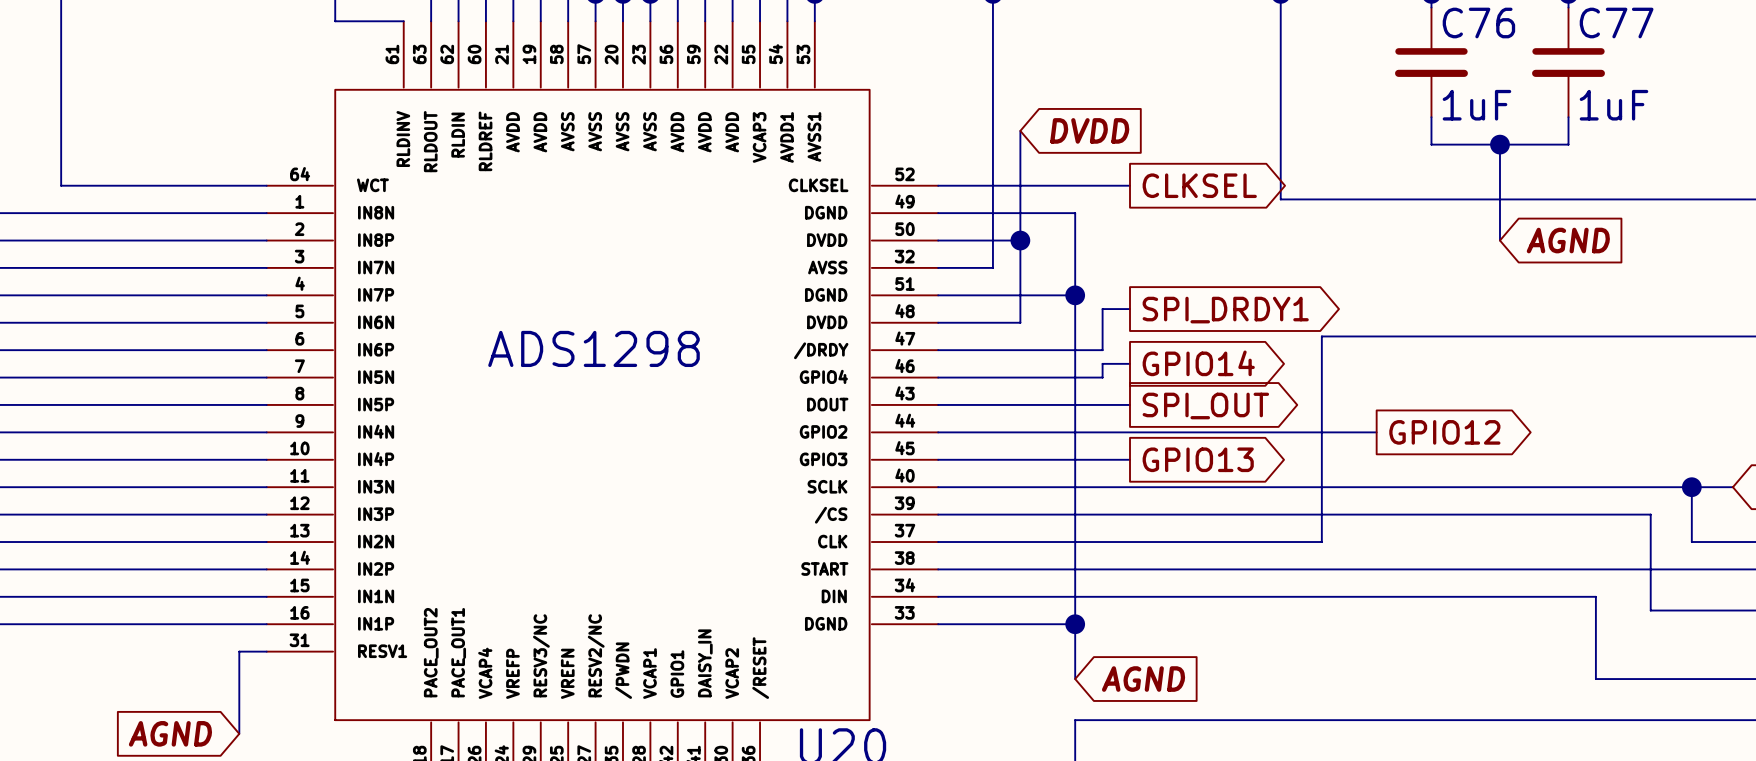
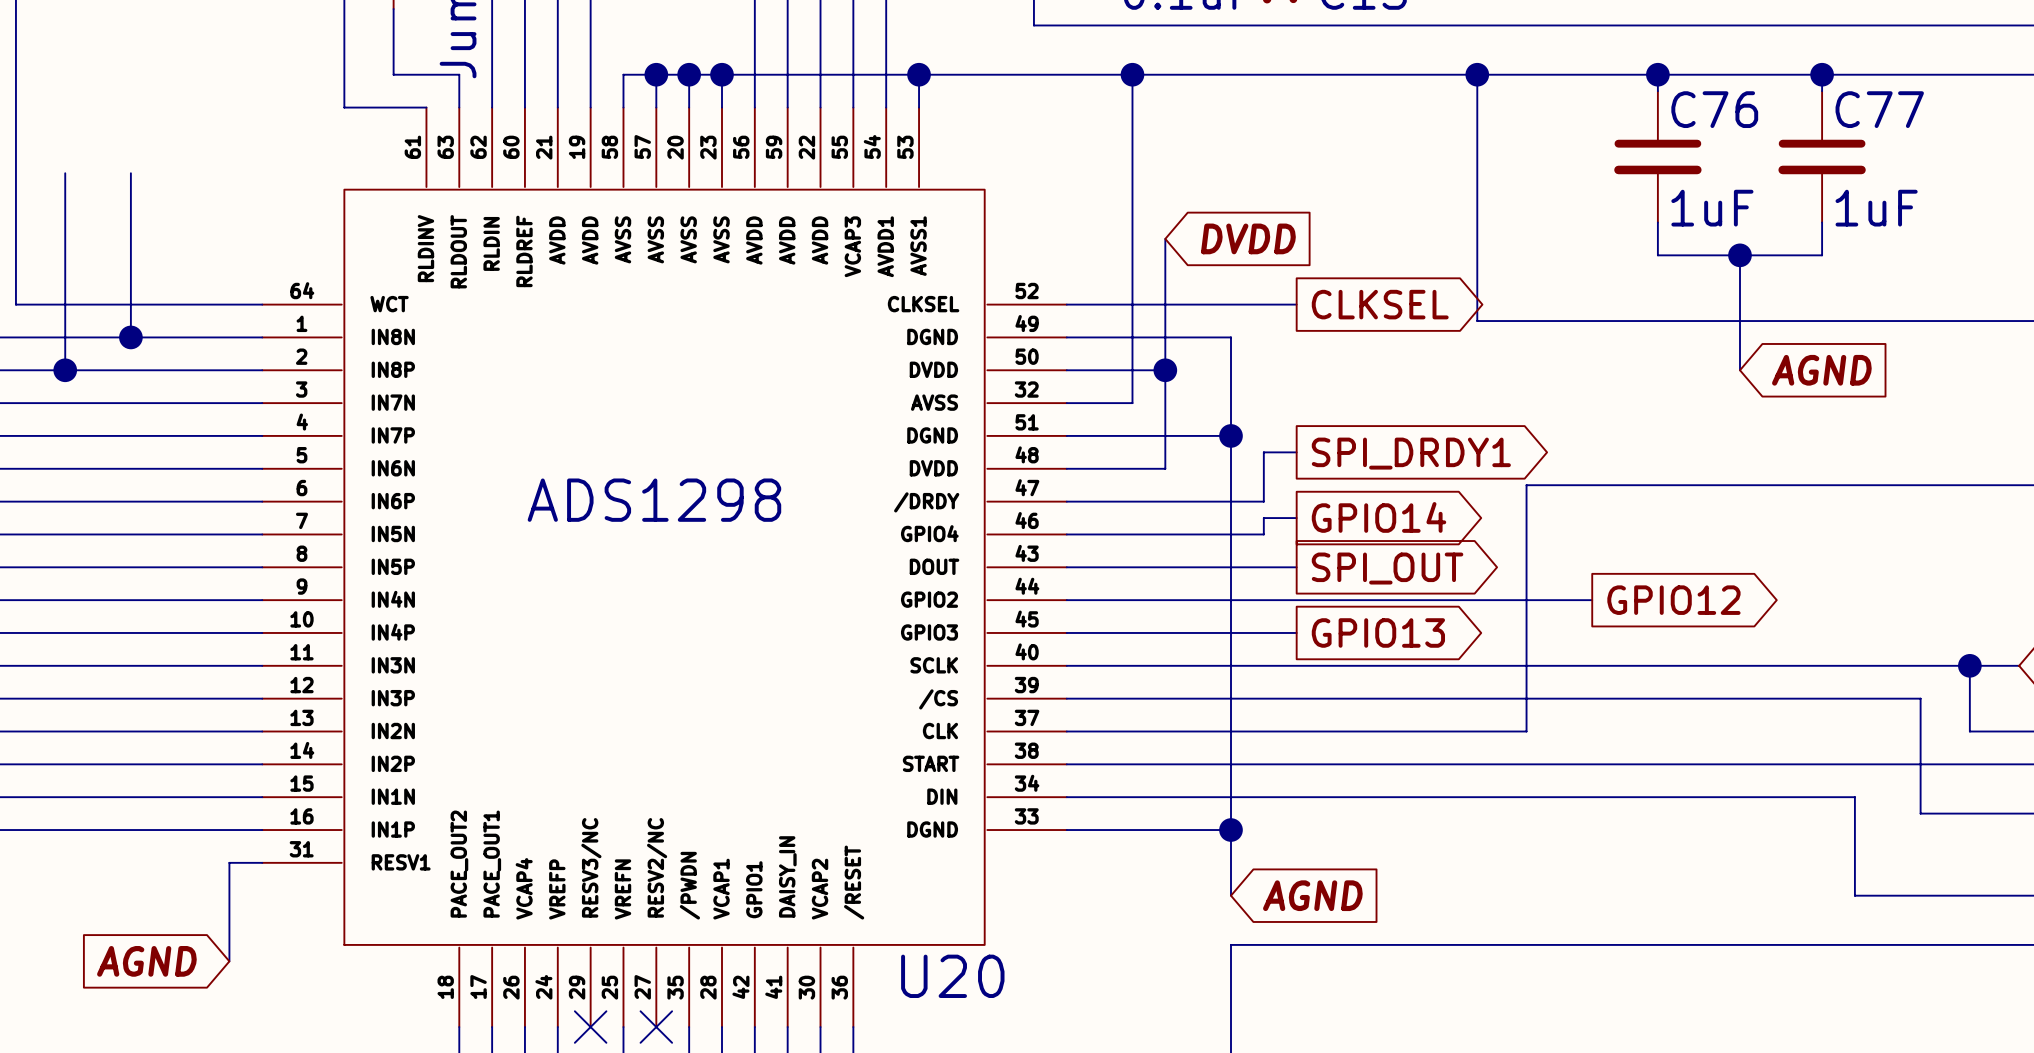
wire: none -> (65, 173) (65, 370)
wire: none -> (130, 173) (130, 337)
junction: none -> (130, 337)
junction: none -> (65, 370)

